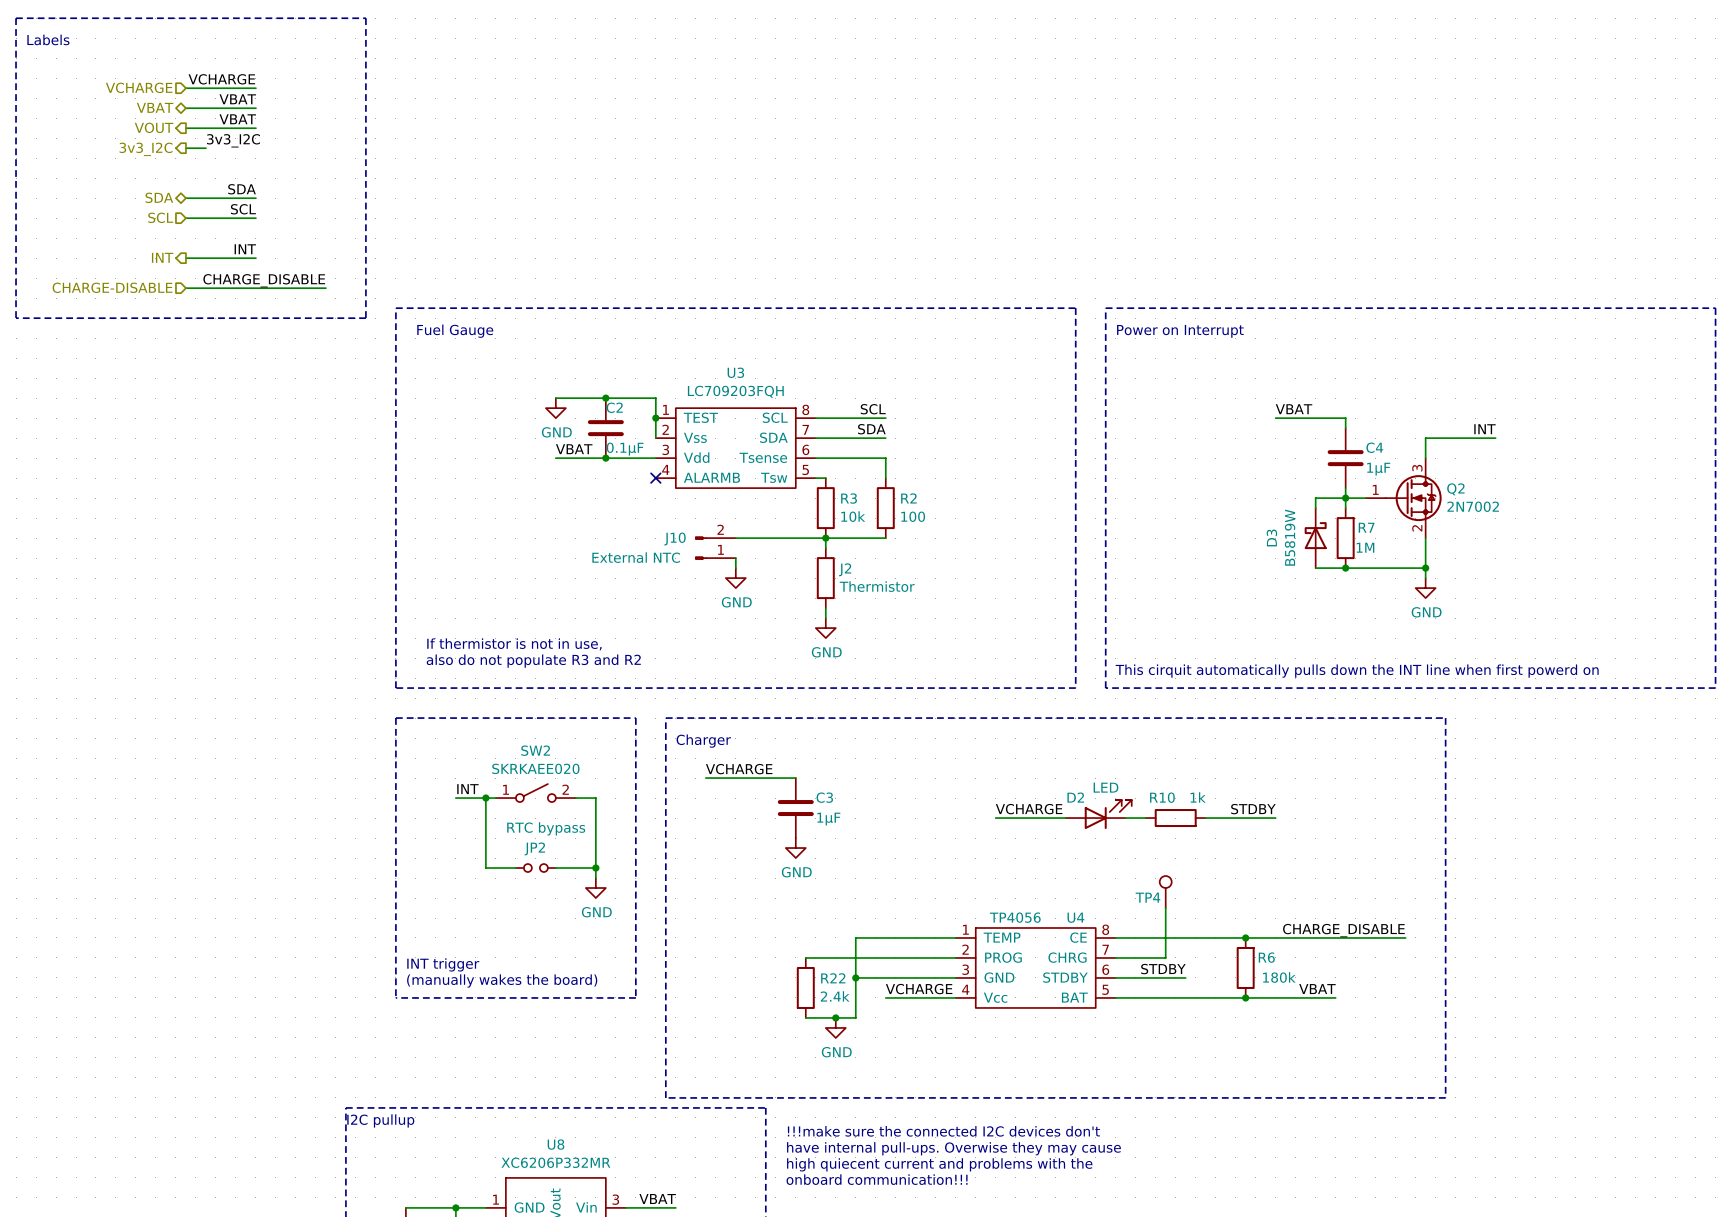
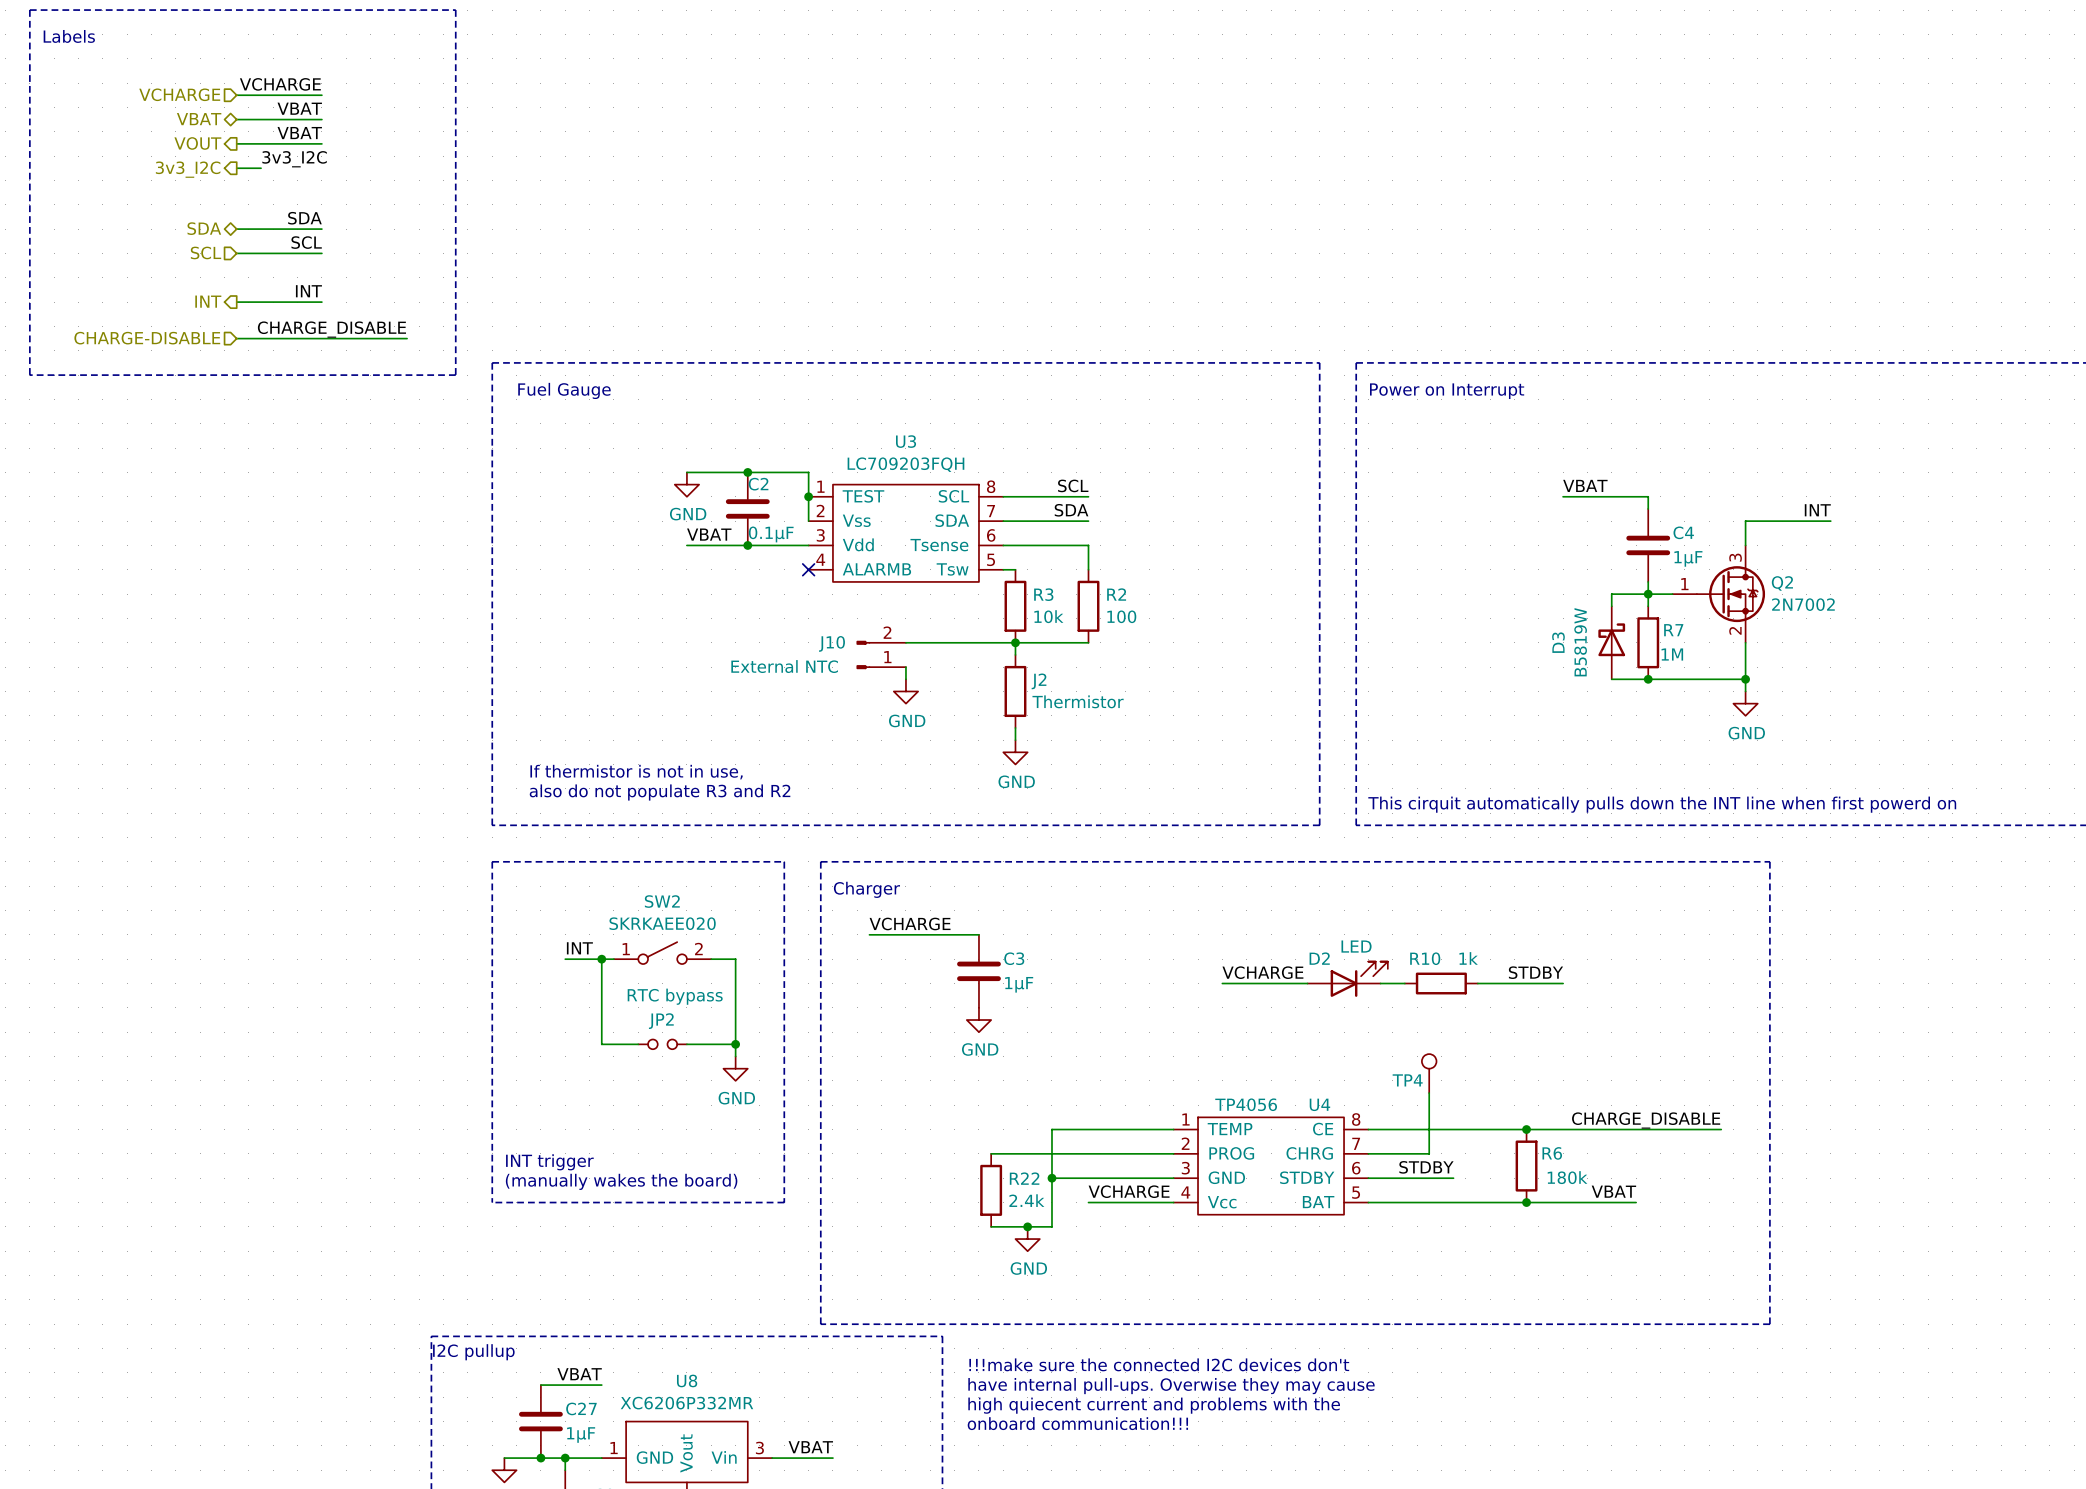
label: none -> VBAT (579, 1374)
wire: none -> (540, 1385) (601, 1385)
C27: none -> 1µF (540, 1421)
junction: none -> (540, 1458)

